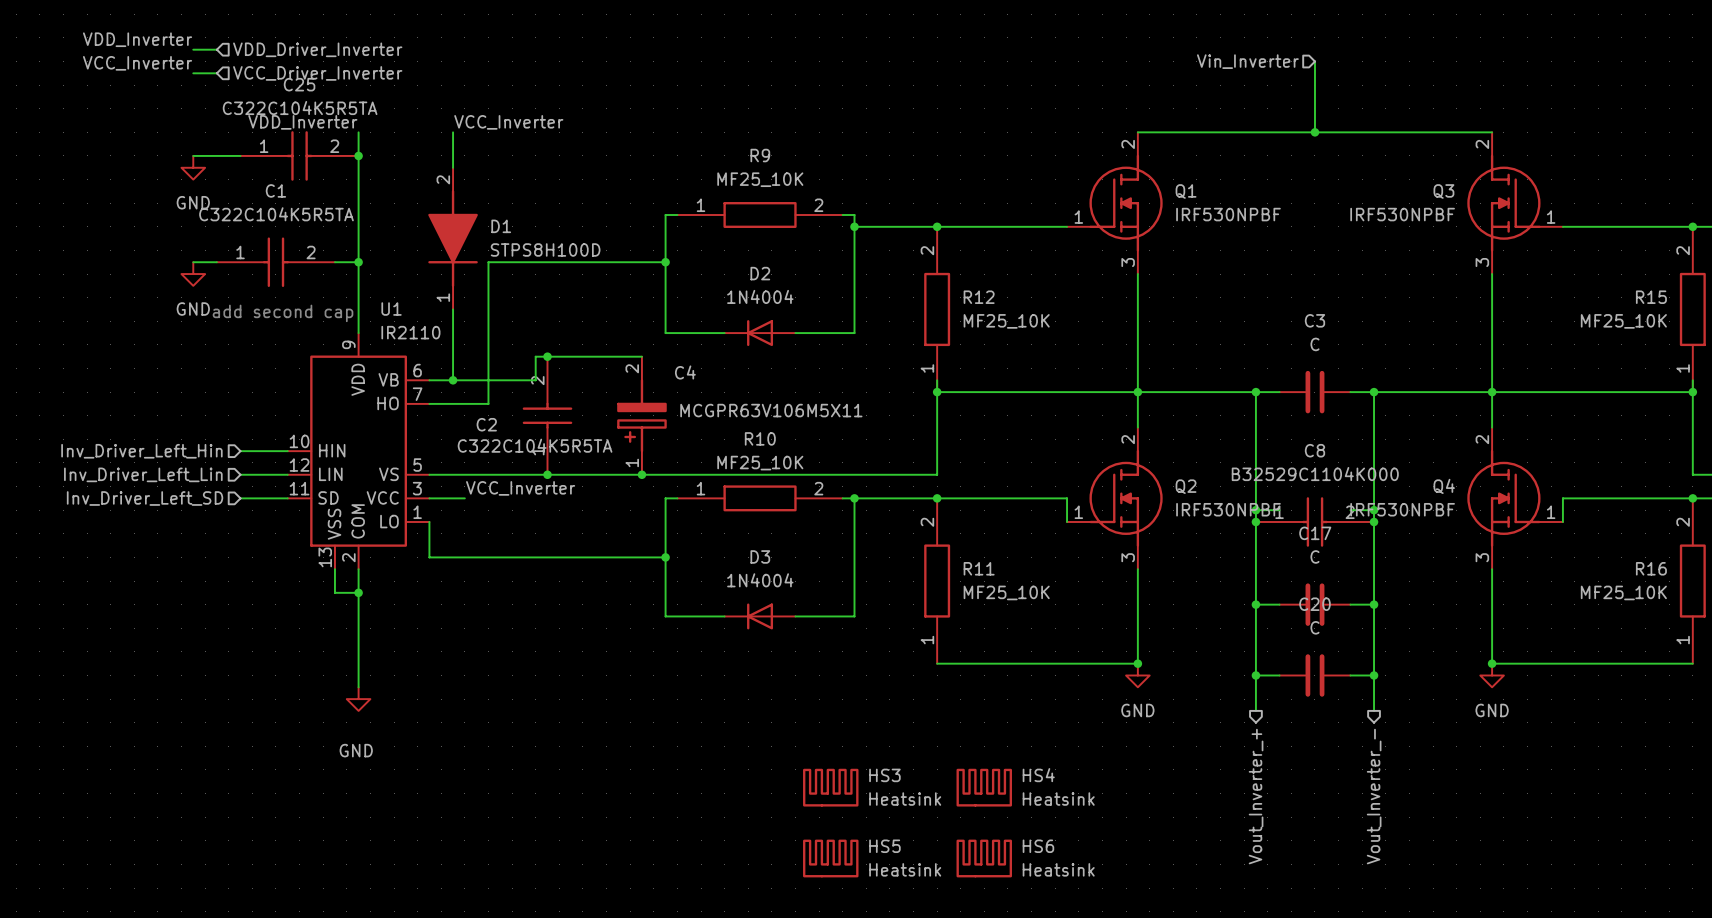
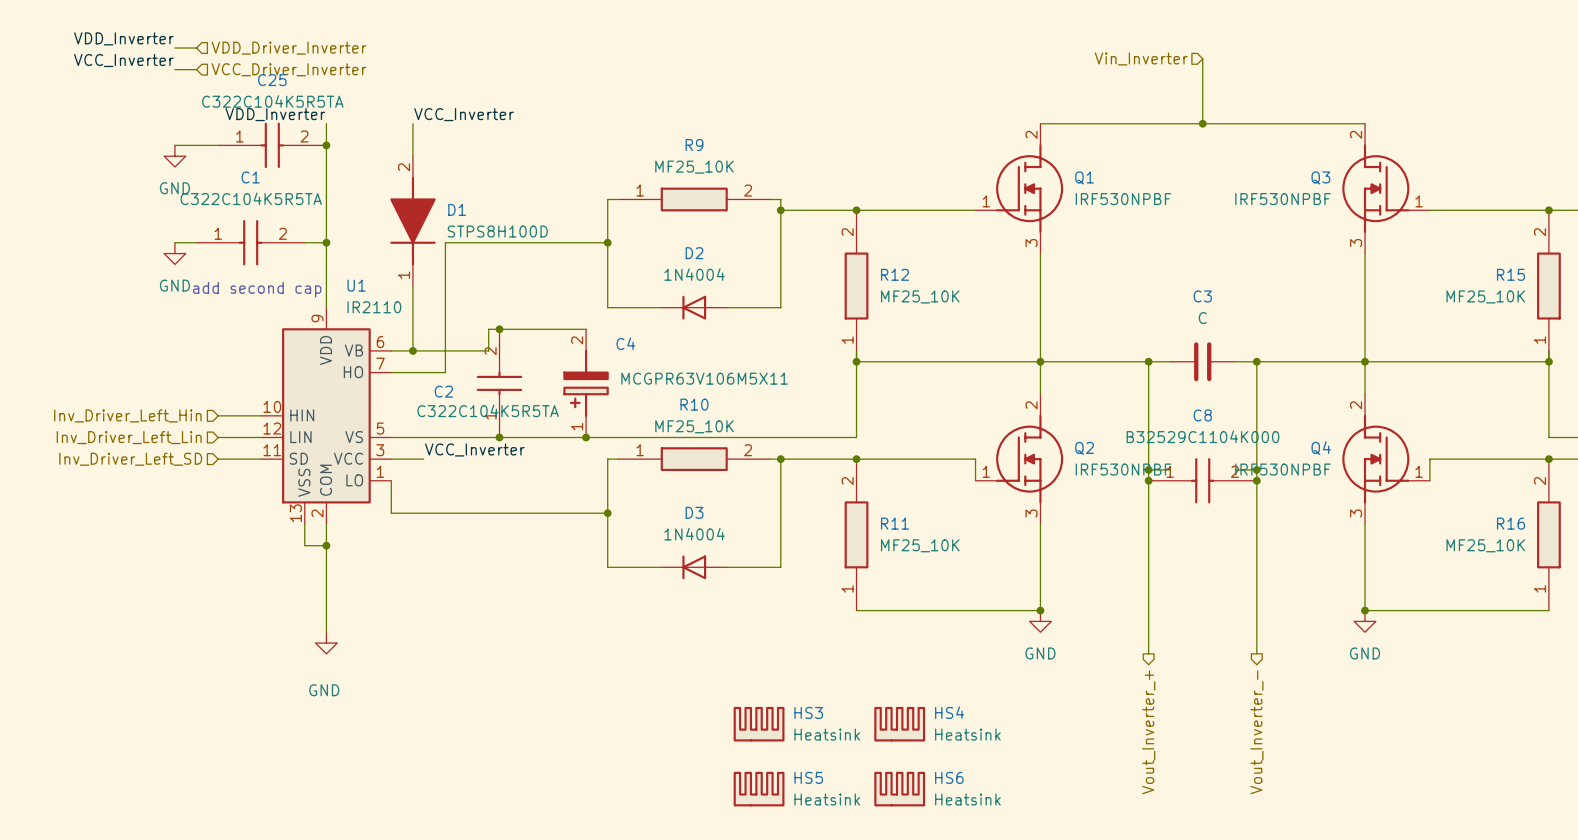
wire: (1255, 604) (1279, 604) -> none
junction: (1255, 604) -> none
C17: C (1314, 604) -> none
wire: (1350, 604) (1374, 604) -> none
junction: (1374, 604) -> none
wire: (1255, 675) (1279, 675) -> none
junction: (1255, 675) -> none
C20: C (1314, 675) -> none
wire: (1350, 675) (1374, 675) -> none
junction: (1374, 675) -> none

